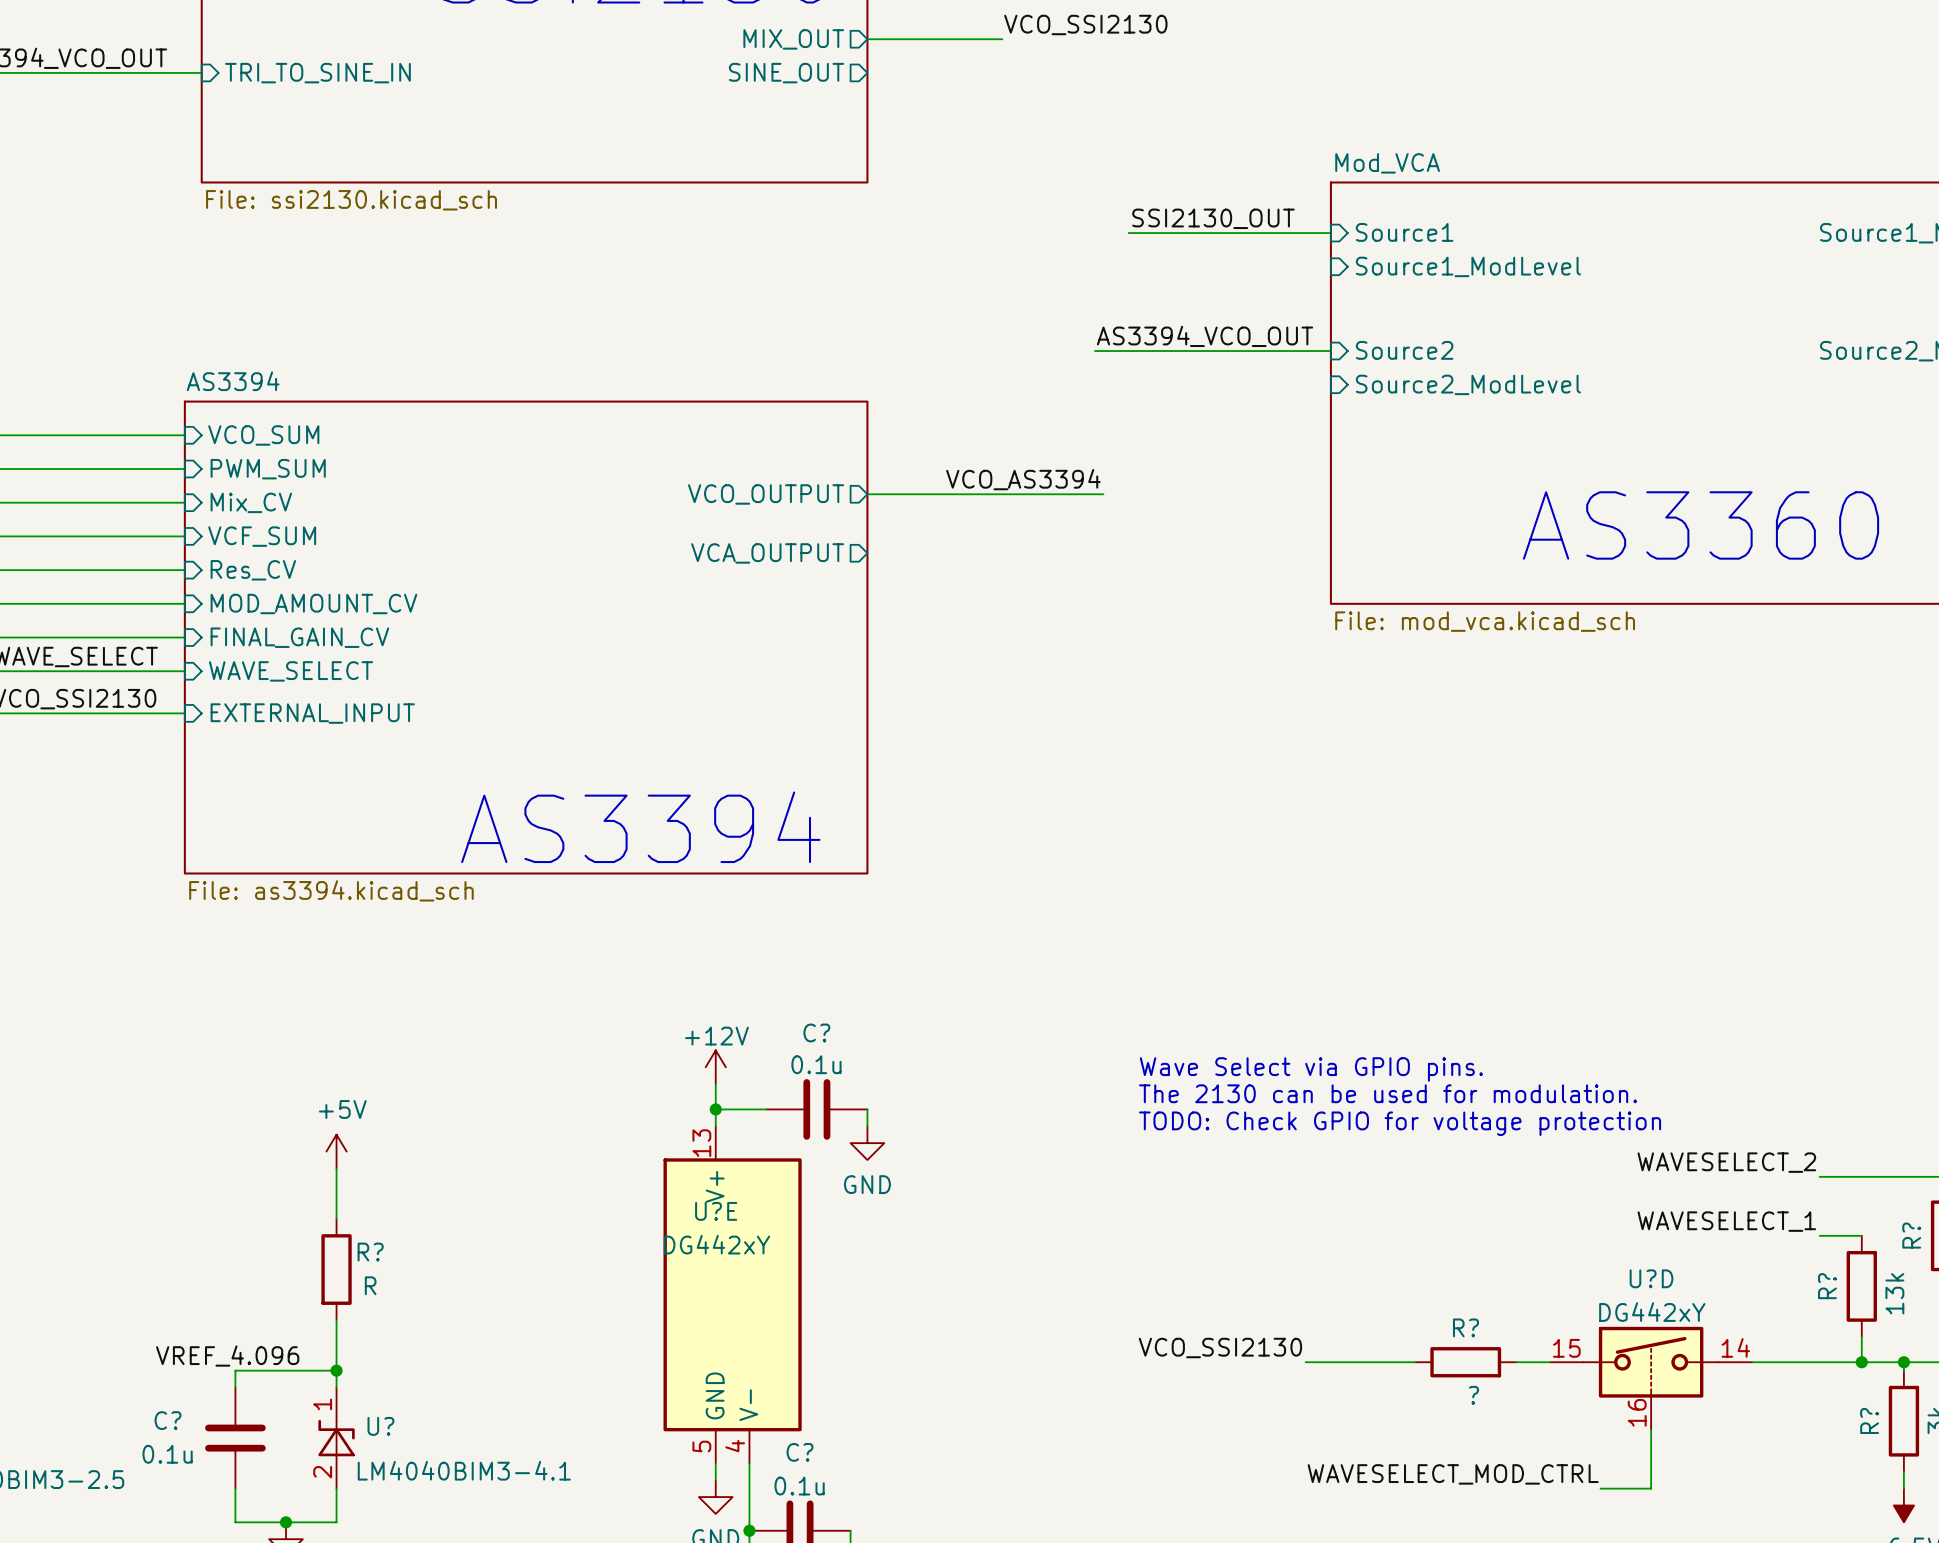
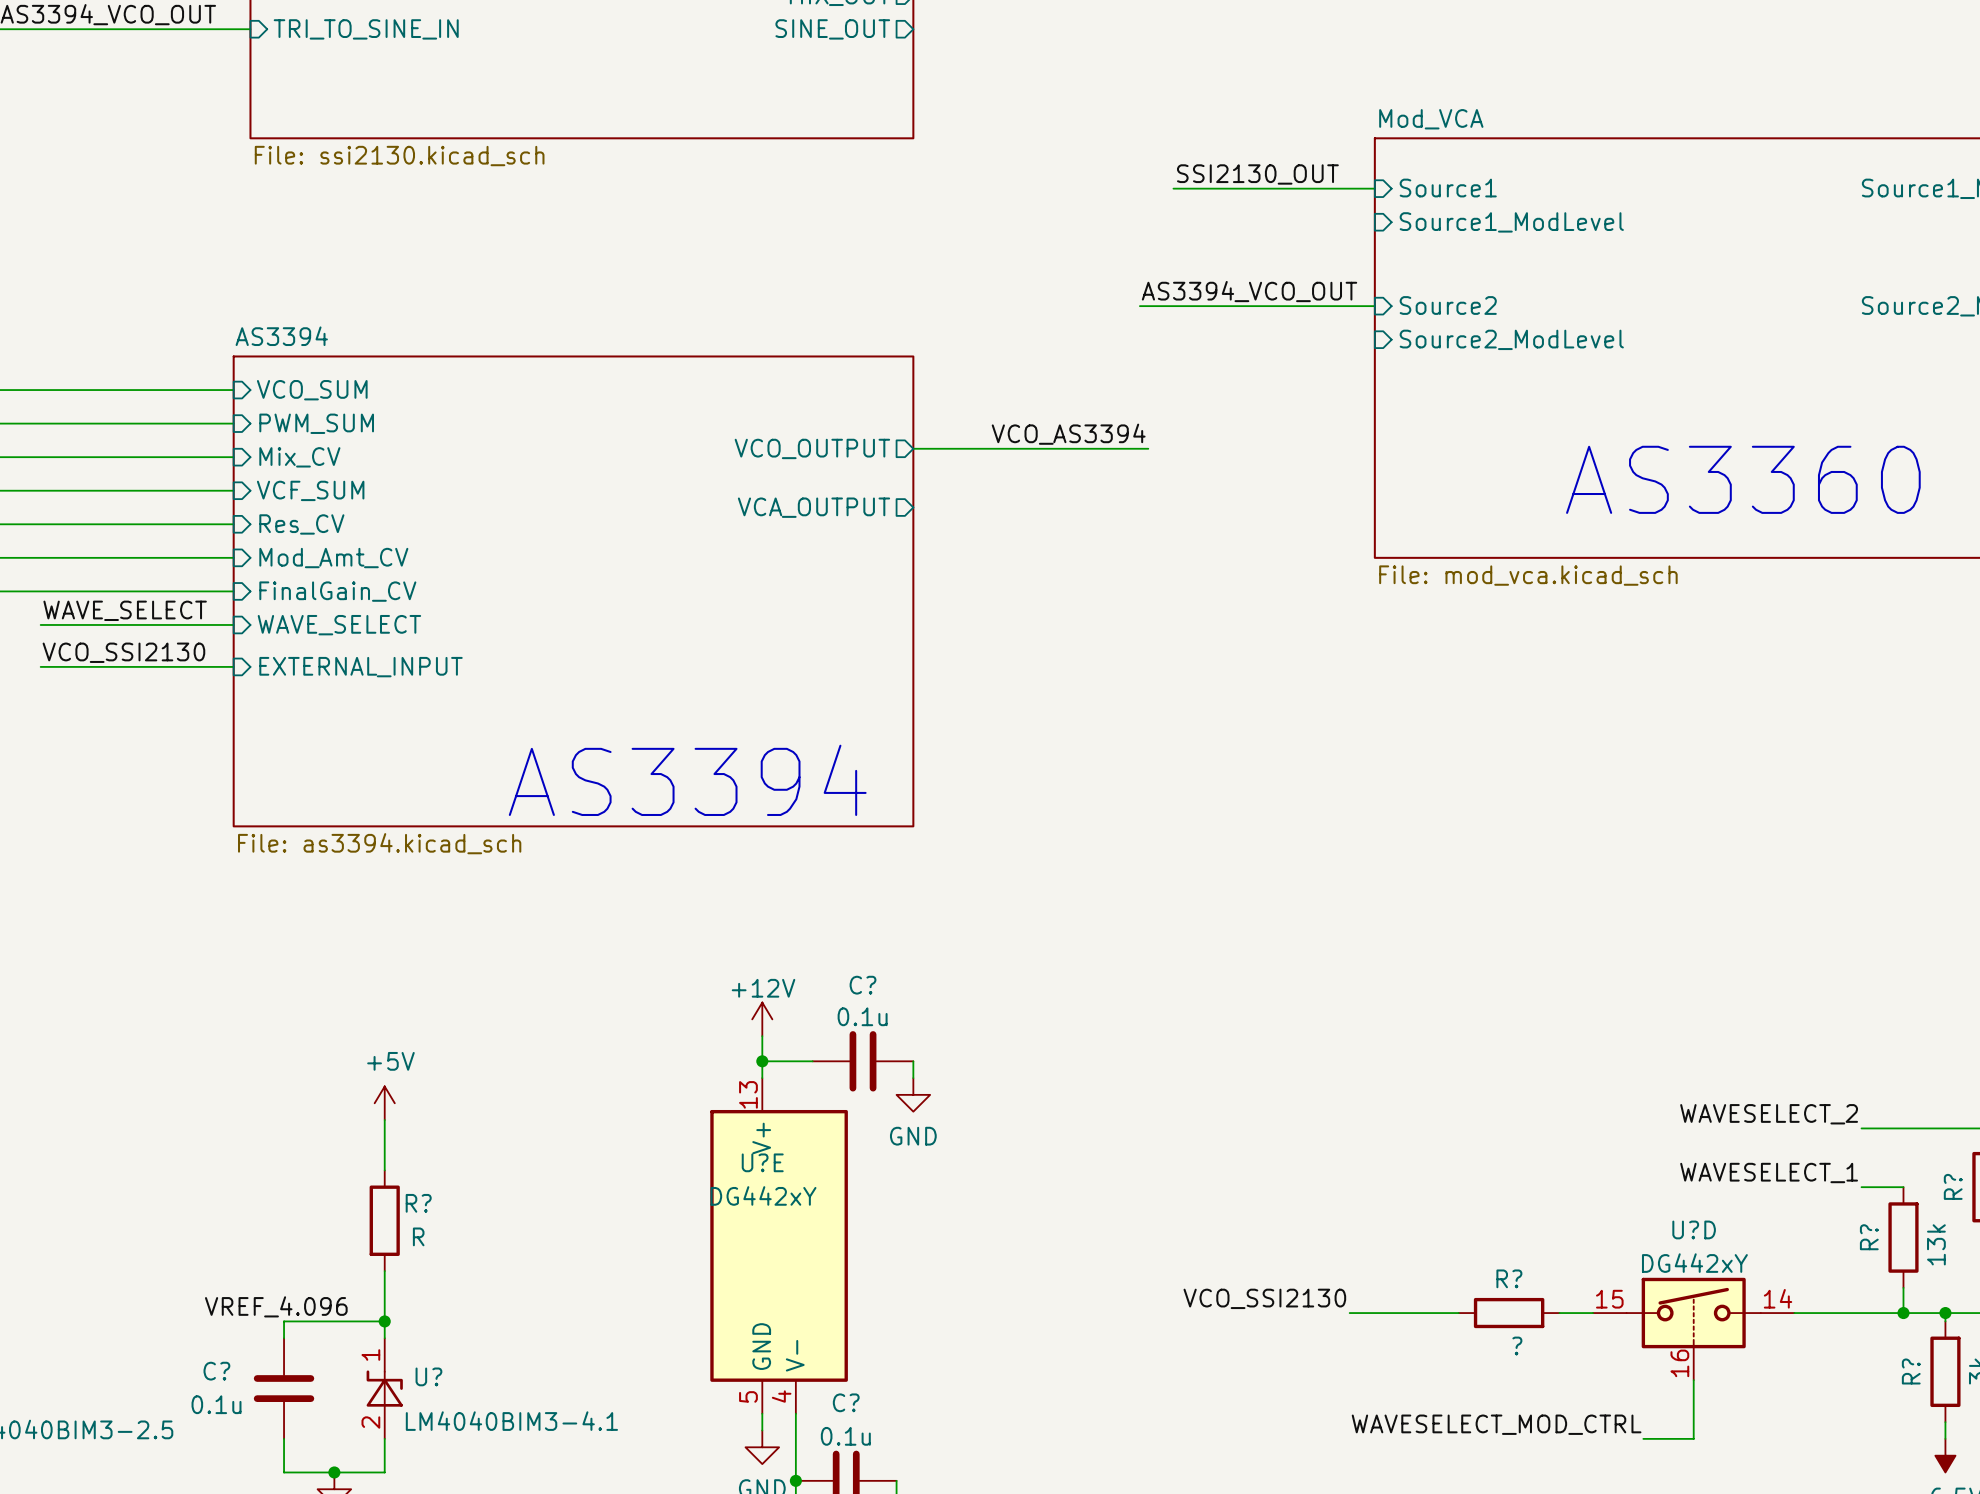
sheet pin: MOD_AMOUNT_CV (313, 604) -> Mod_Amt_CV (333, 558)
sheet pin: FINAL_GAIN_CV (299, 637) -> FinalGain_CV (337, 591)
text: Wave Select via GPIO pins. (1311, 1069) -> none
text: The 2130 can be used for modulation. (1388, 1093) -> none
text: TODO: Check GPIO for voltage protection (1400, 1123) -> none

